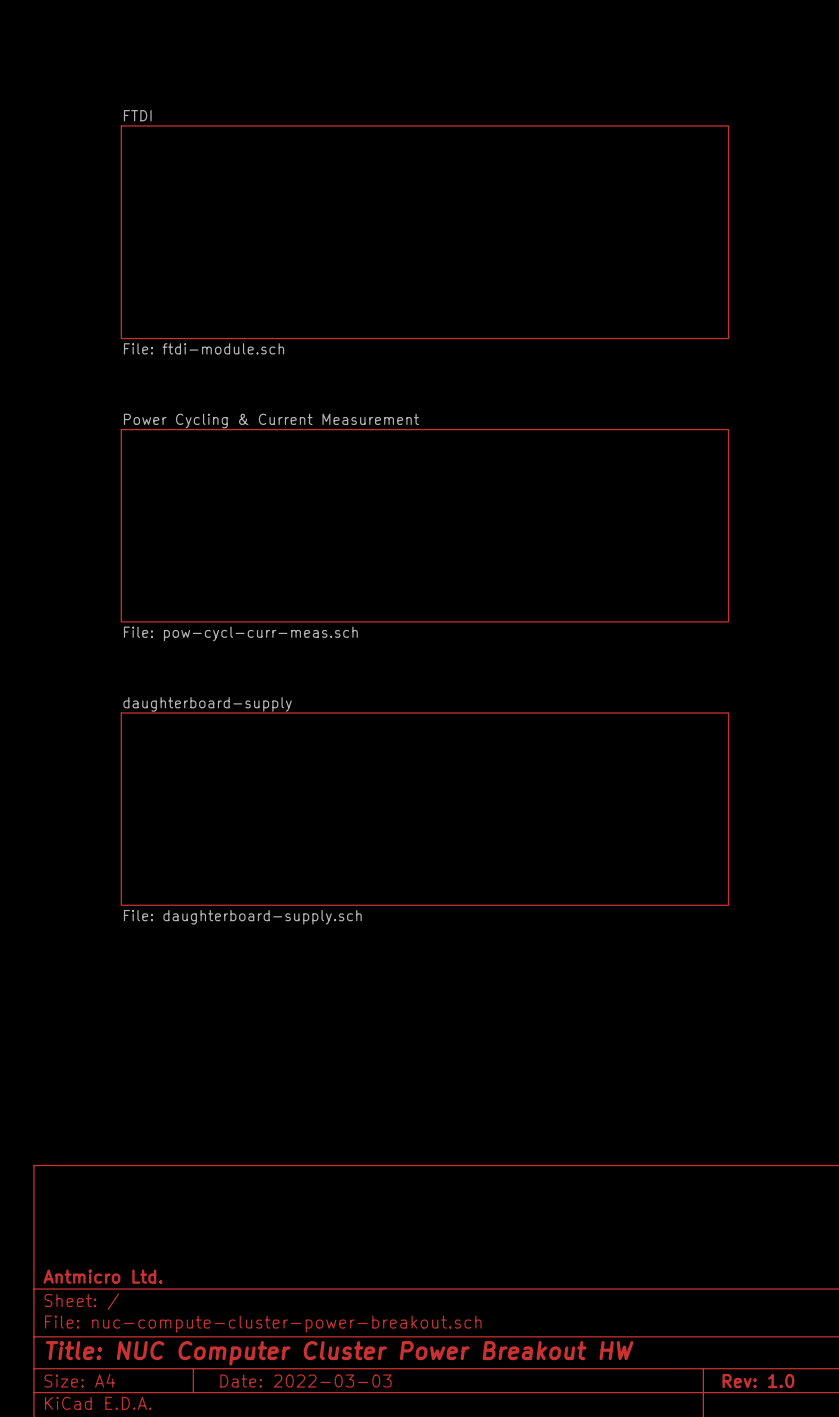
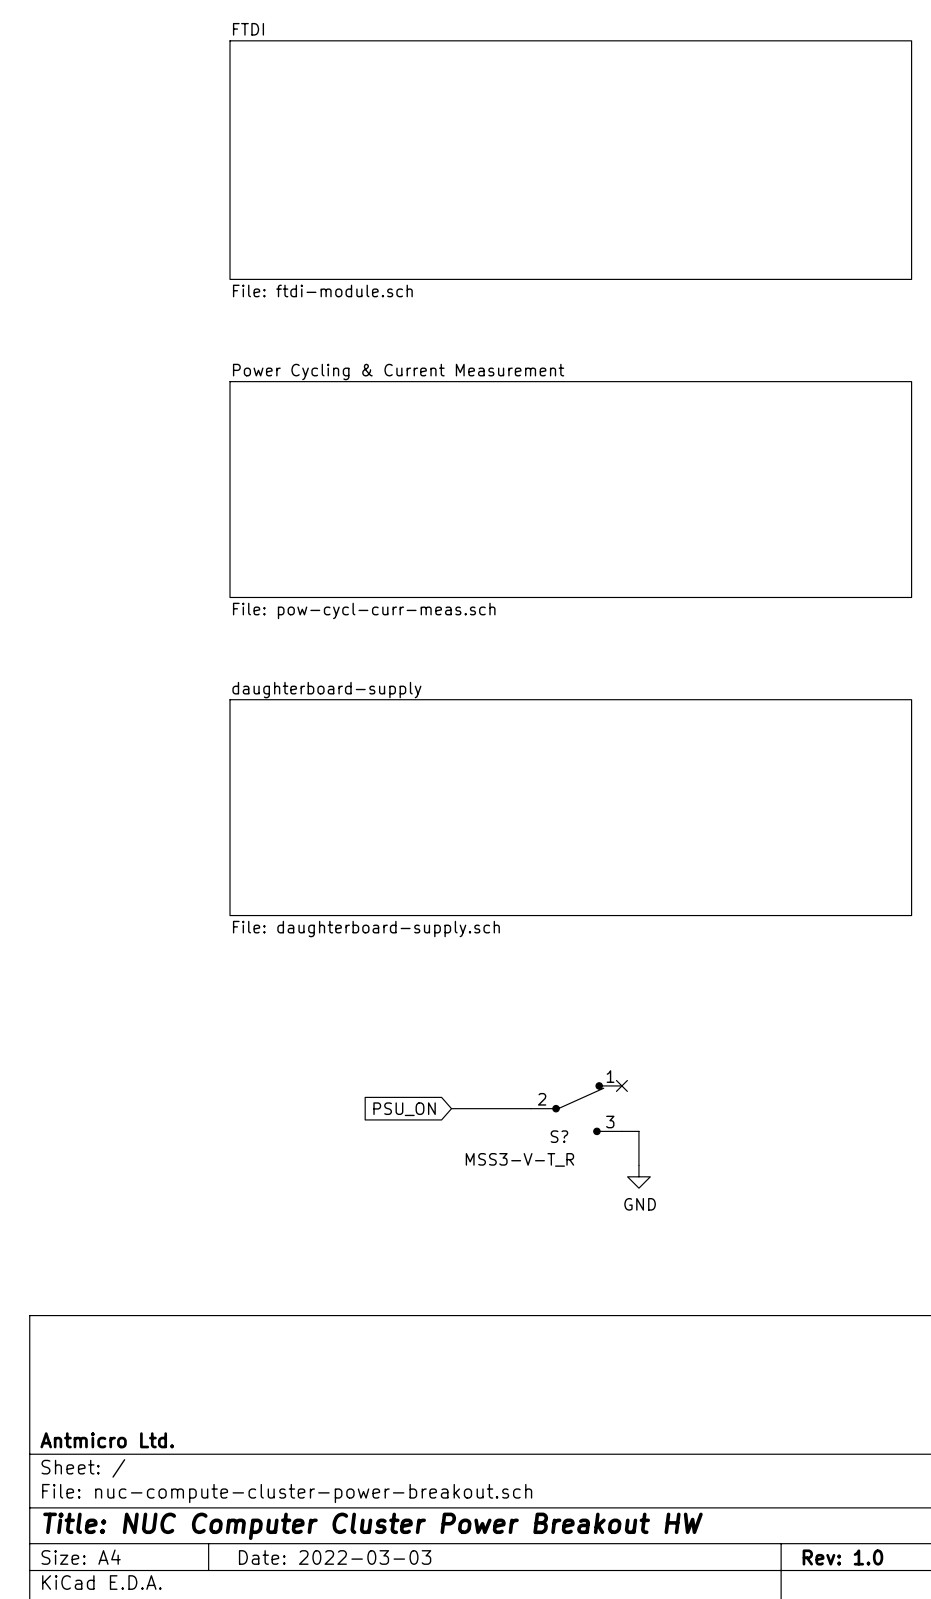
sheet FTDI position: (424, 232) -> (570, 160)
sheet Power Cycling & Current Measurement position: (424, 525) -> (570, 489)
sheet daughterboard-supply position: (424, 809) -> (570, 807)
no-connect mark: none -> (621, 1085)
global label: none -> PSU_ON (404, 1109)
wire: none -> (451, 1108) (531, 1108)
S?: none -> MSS3-V-T_R (576, 1108)
wire: none -> (621, 1131) (638, 1131) (638, 1165)
power symbol: none -> GND (638, 1176)

